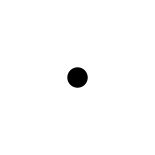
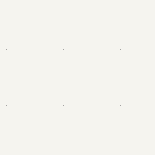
junction: (77, 77) -> none

